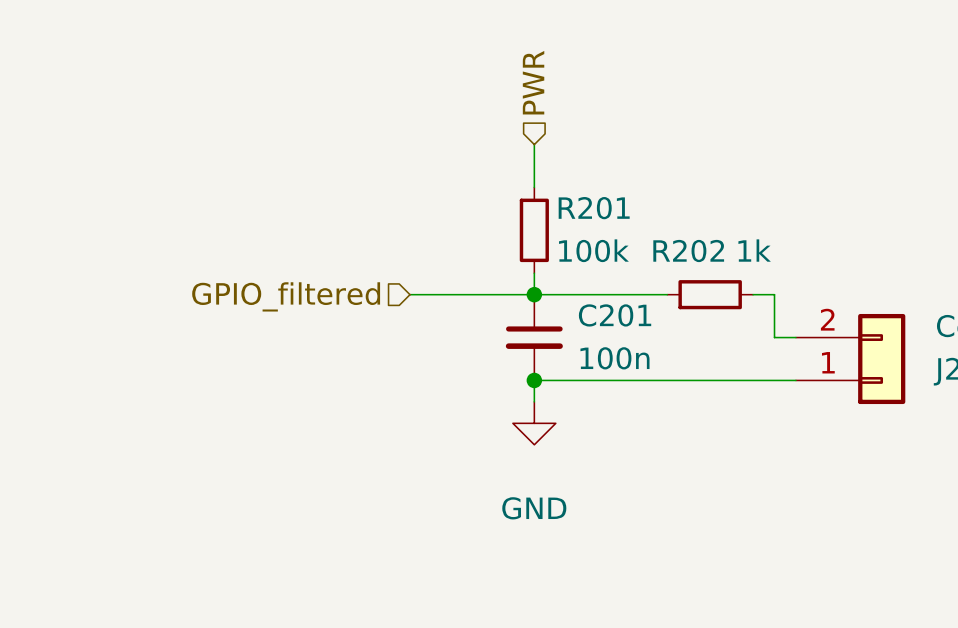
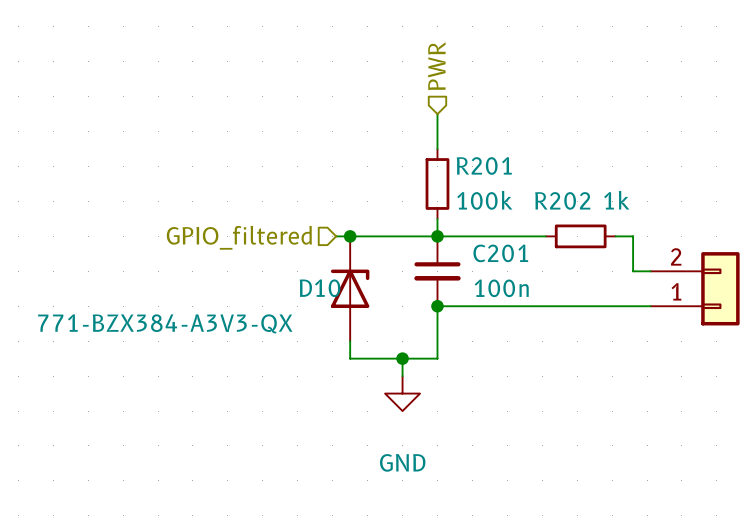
junction: none -> (350, 236)
D10: none -> 771-BZX384-A3V3-QX (350, 288)
wire: none -> (437, 323) (437, 358) (350, 358) (350, 341)
power symbol position: GND (534, 423) -> GND (402, 393)
wire: none -> (402, 358) (402, 376)
junction: none -> (402, 358)

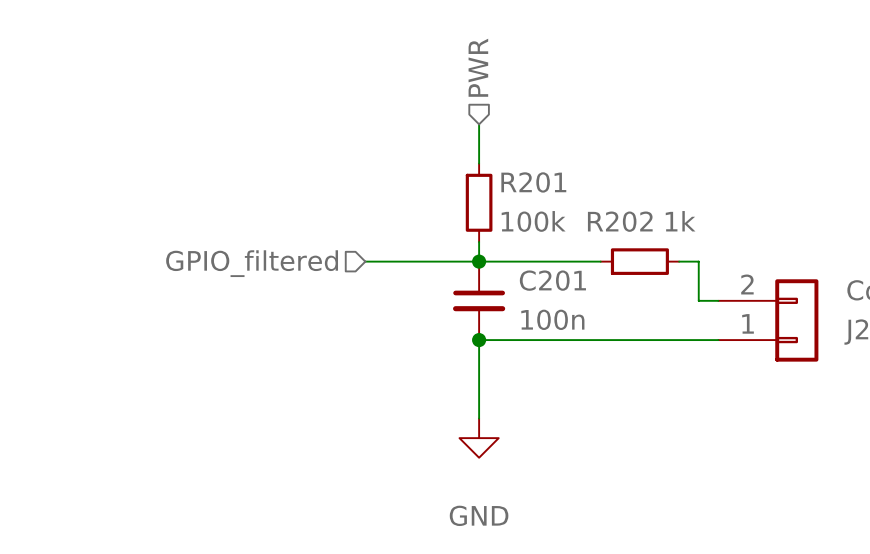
junction: (350, 236) -> none
D10: 771-BZX384-A3V3-QX (350, 288) -> none
wire: (350, 341) (350, 358) (437, 358) -> (479, 418) (479, 398)
wire: (402, 358) (402, 376) -> none
junction: (402, 358) -> none
power symbol position: GND (402, 393) -> GND (479, 438)

